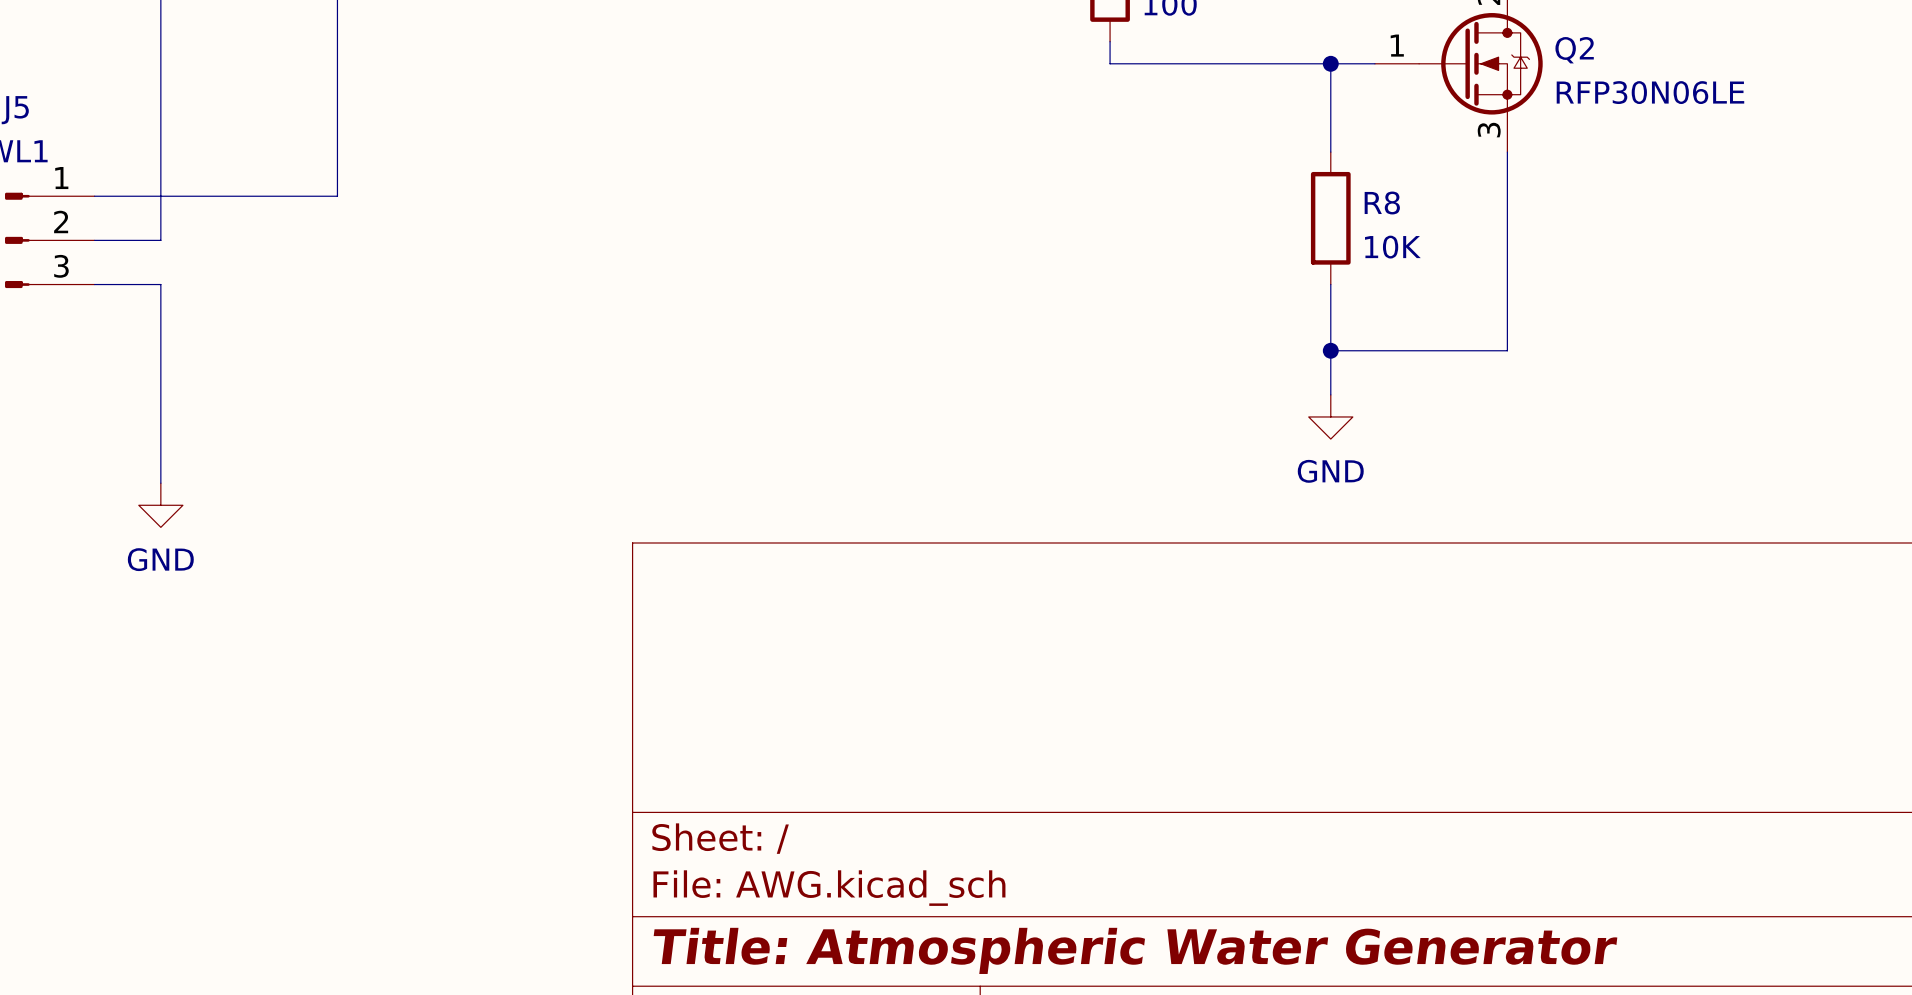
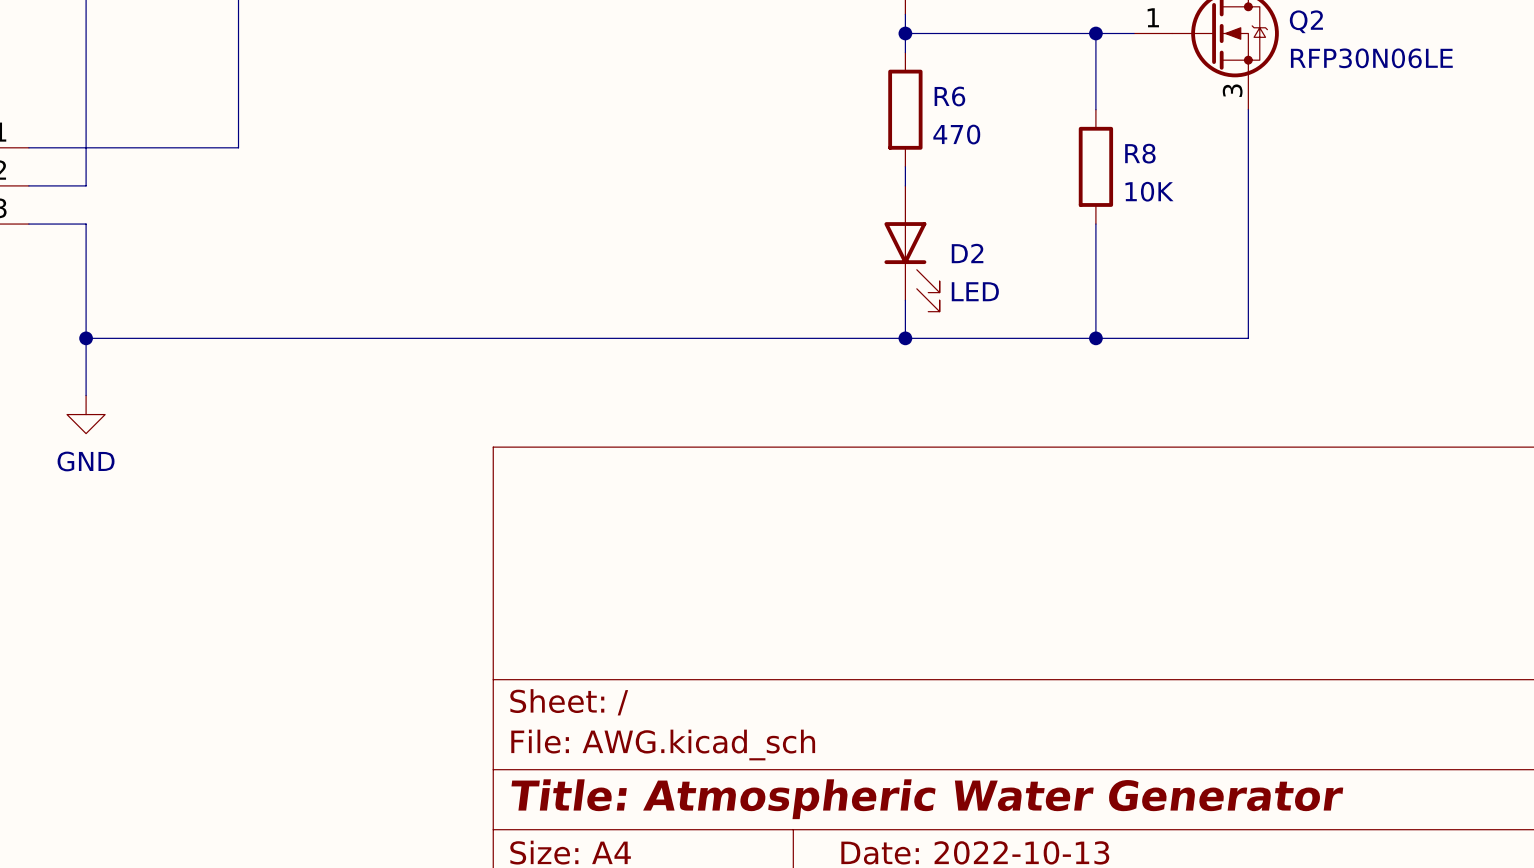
wire: none -> (905, 33) (905, 52)
junction: none -> (905, 33)
R6: none -> 470 (905, 109)
wire: none -> (905, 166) (905, 185)
D2: none -> LED (912, 248)
wire: (1330, 350) (1507, 350) -> (86, 338) (1248, 338) (1248, 281)
junction position: (1330, 350) -> (1095, 338)
wire: none -> (905, 300) (905, 338)
junction: none -> (86, 338)
junction: none -> (905, 338)
power symbol: GND (1330, 416) -> none

